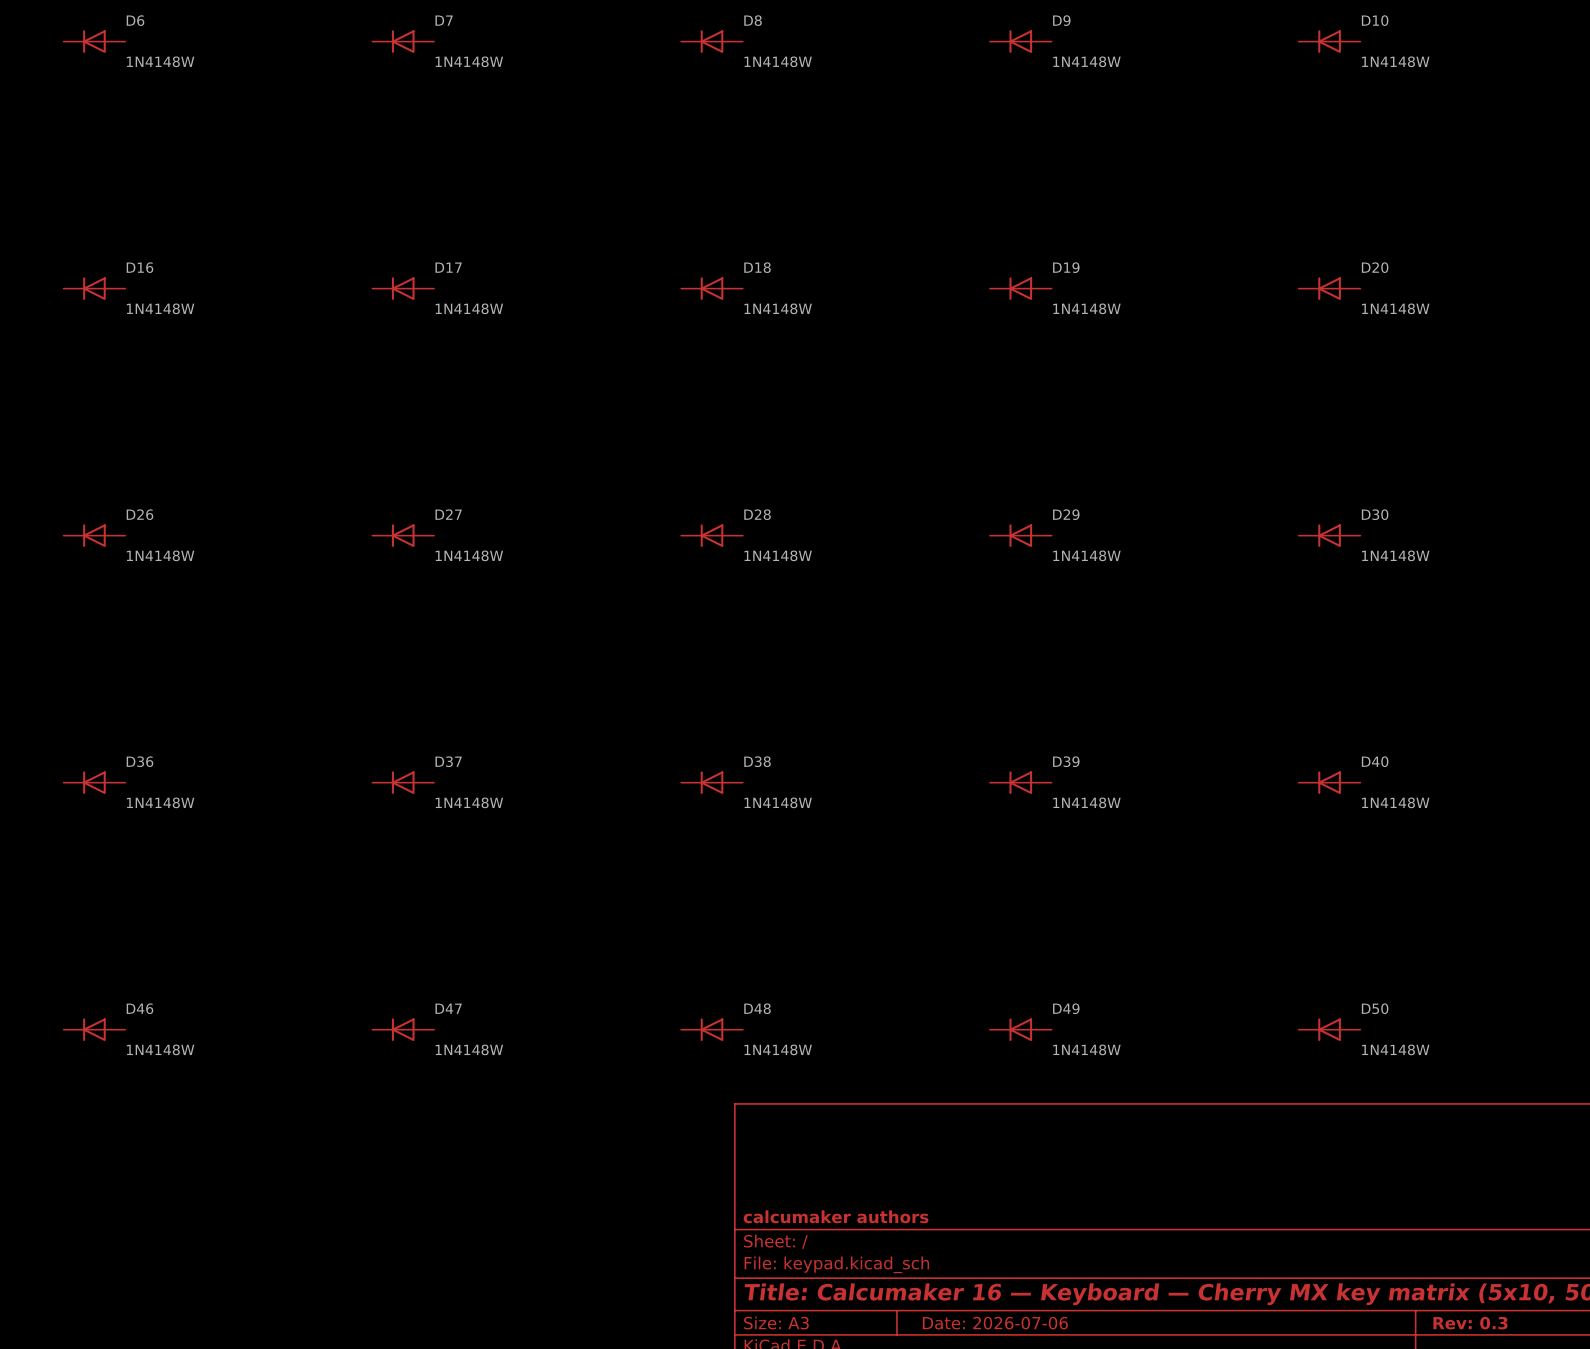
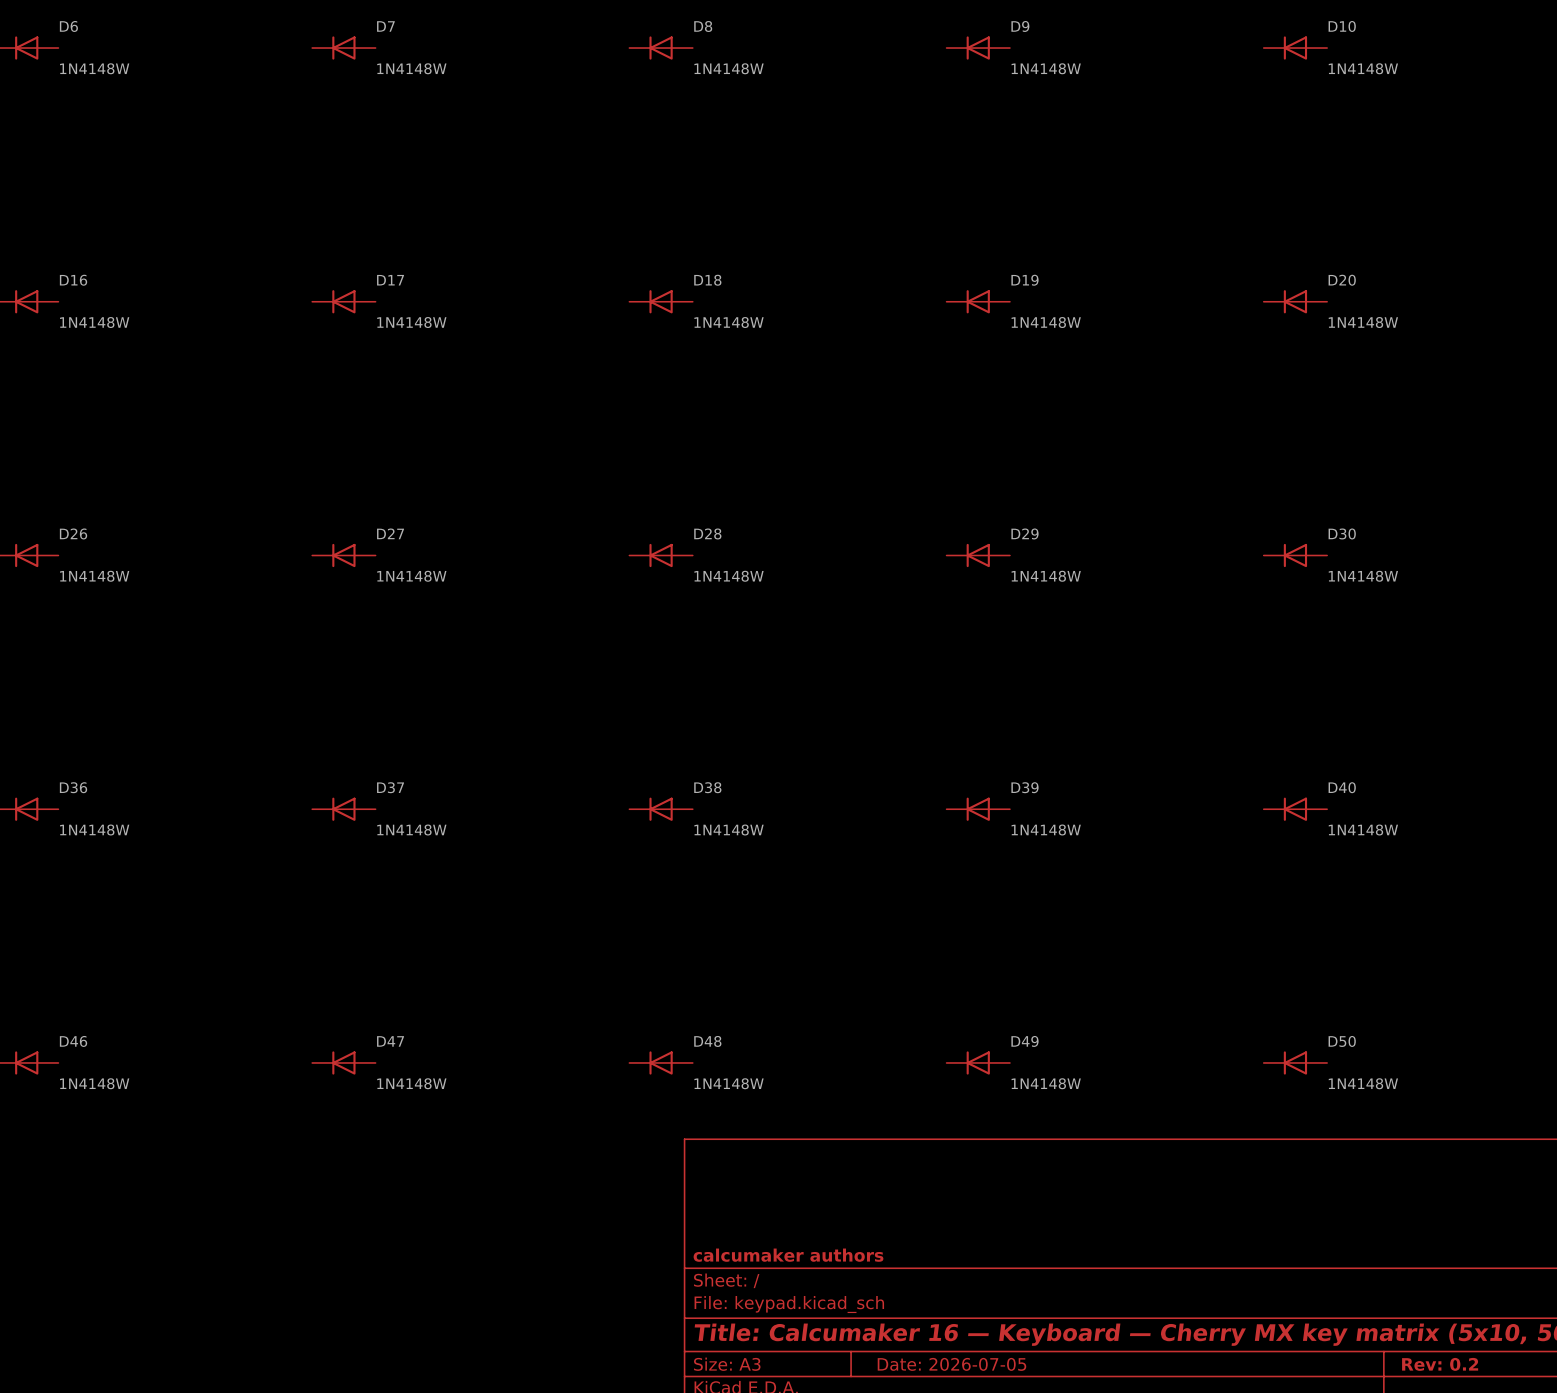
title block: Date: 2026-07-06 (995, 1323) -> Date: 2026-07-05 (951, 1364)
title block: Rev: 0.3 (1470, 1323) -> Rev: 0.2 (1440, 1364)

